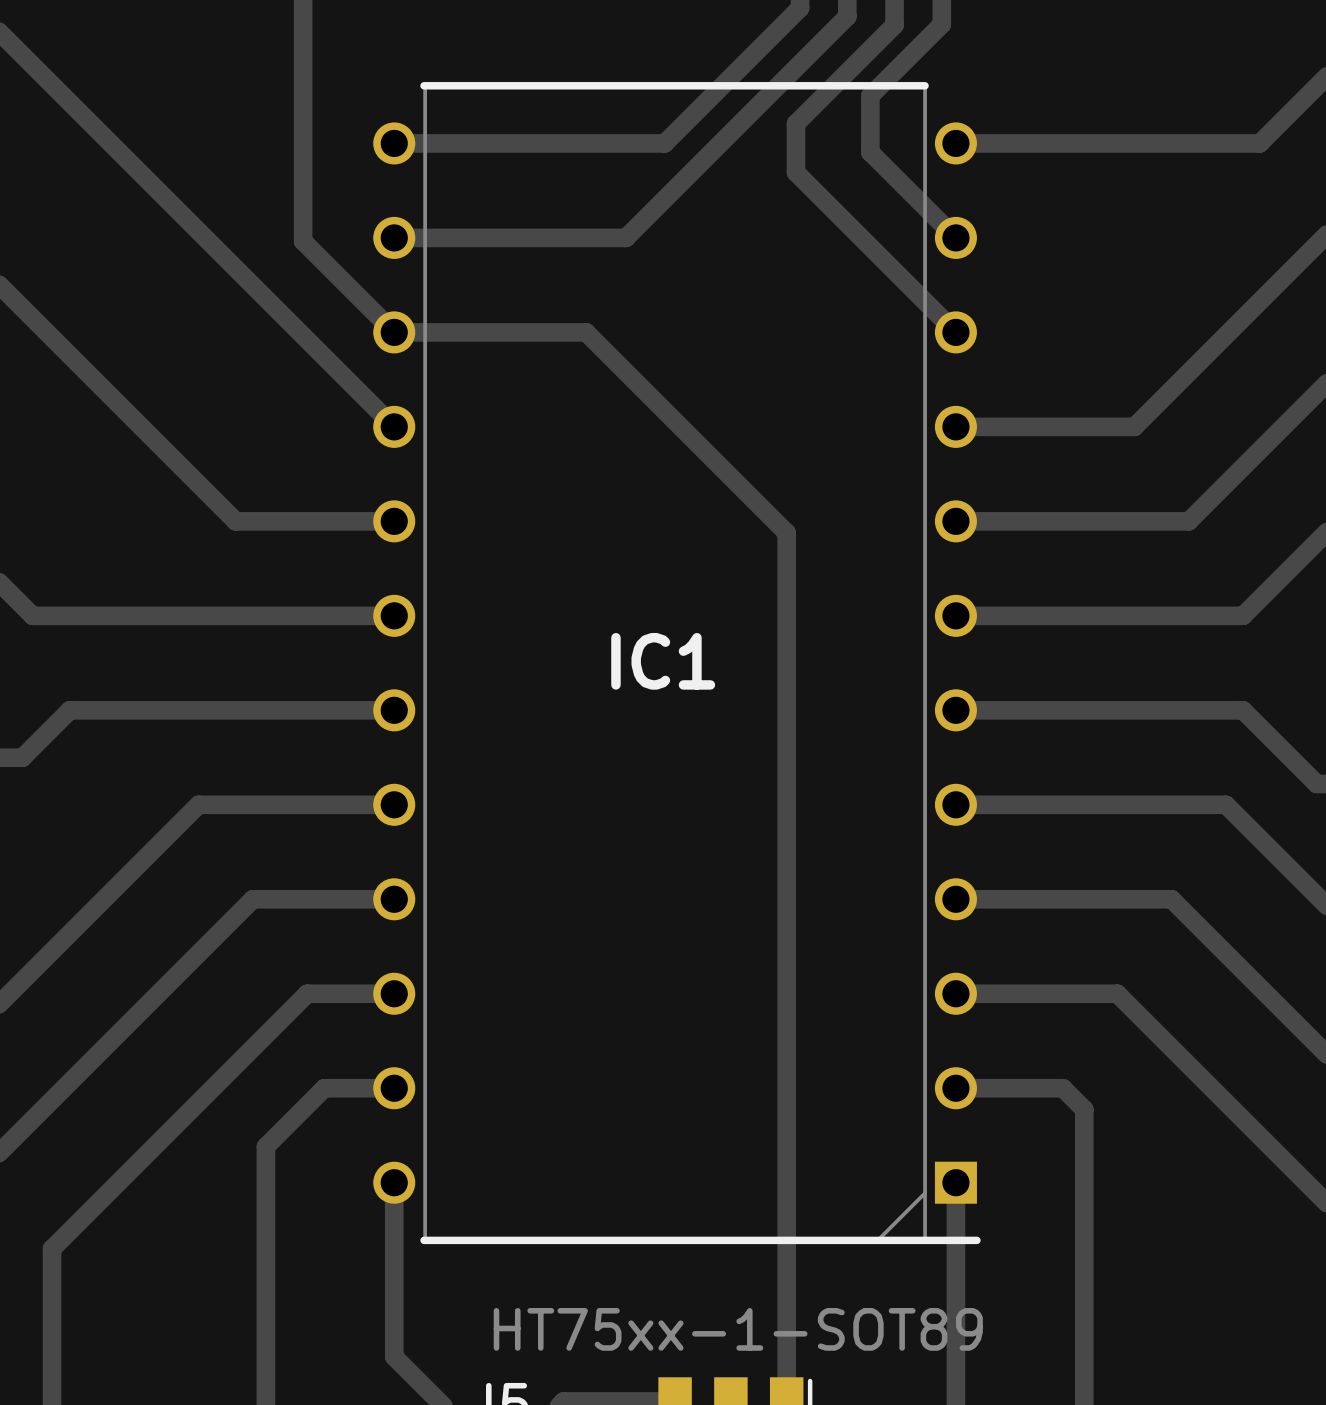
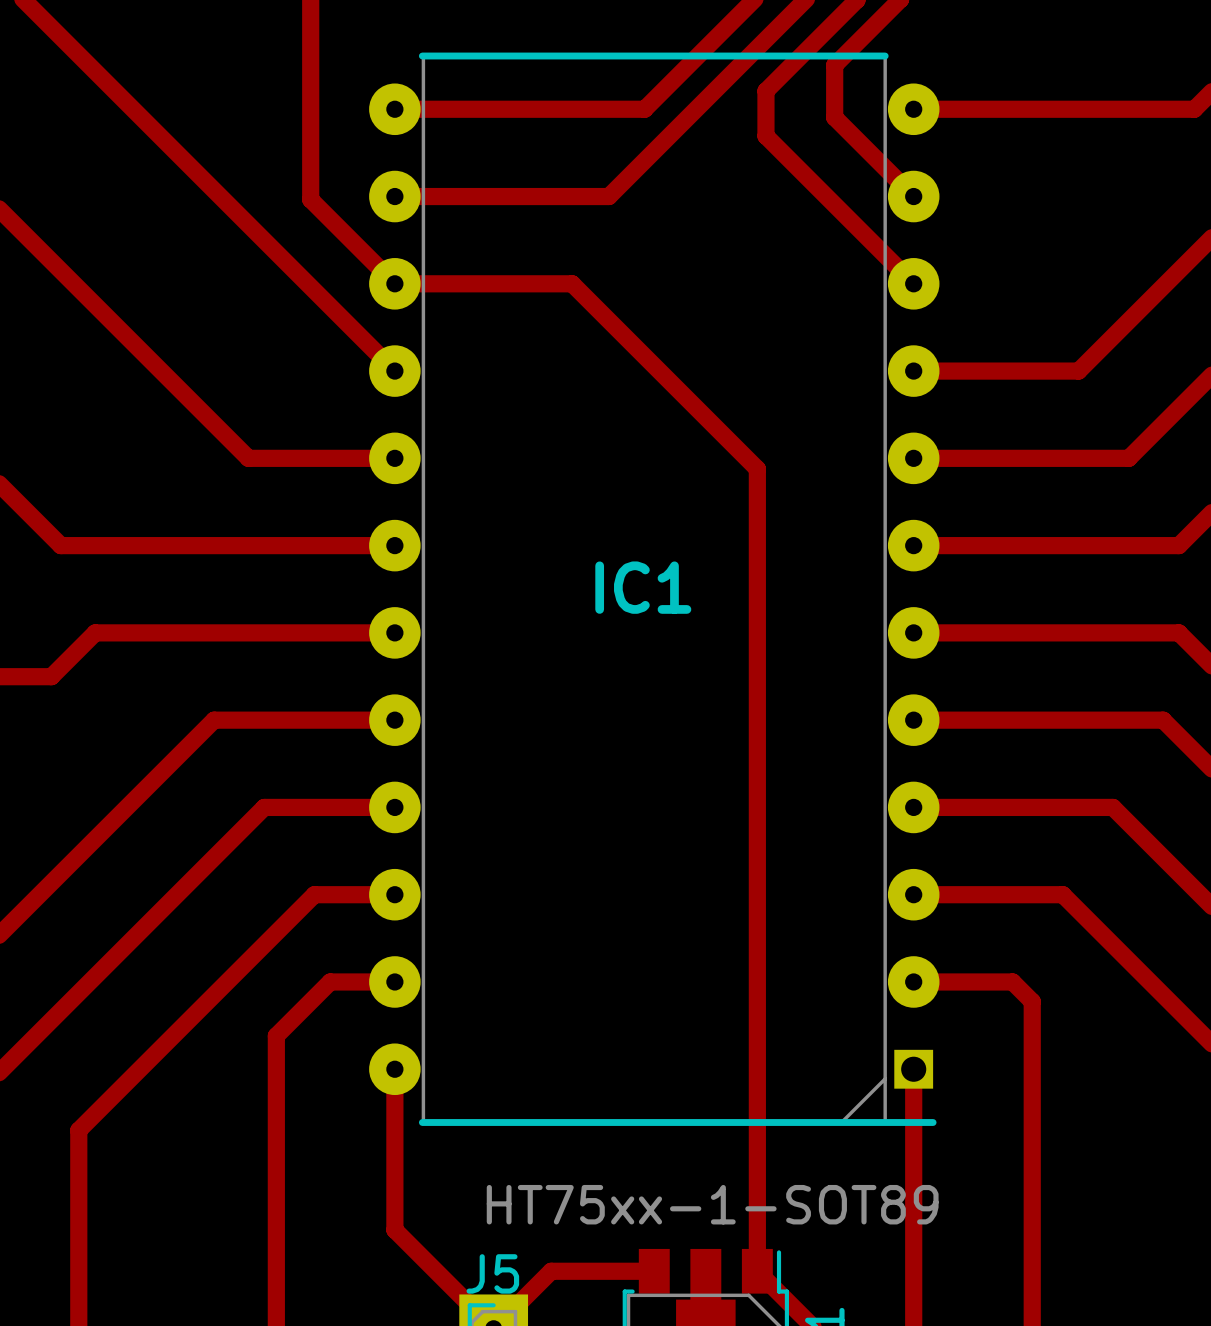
IC1 footprint: [373, 82, 981, 1245] -> [369, 52, 940, 1126]

